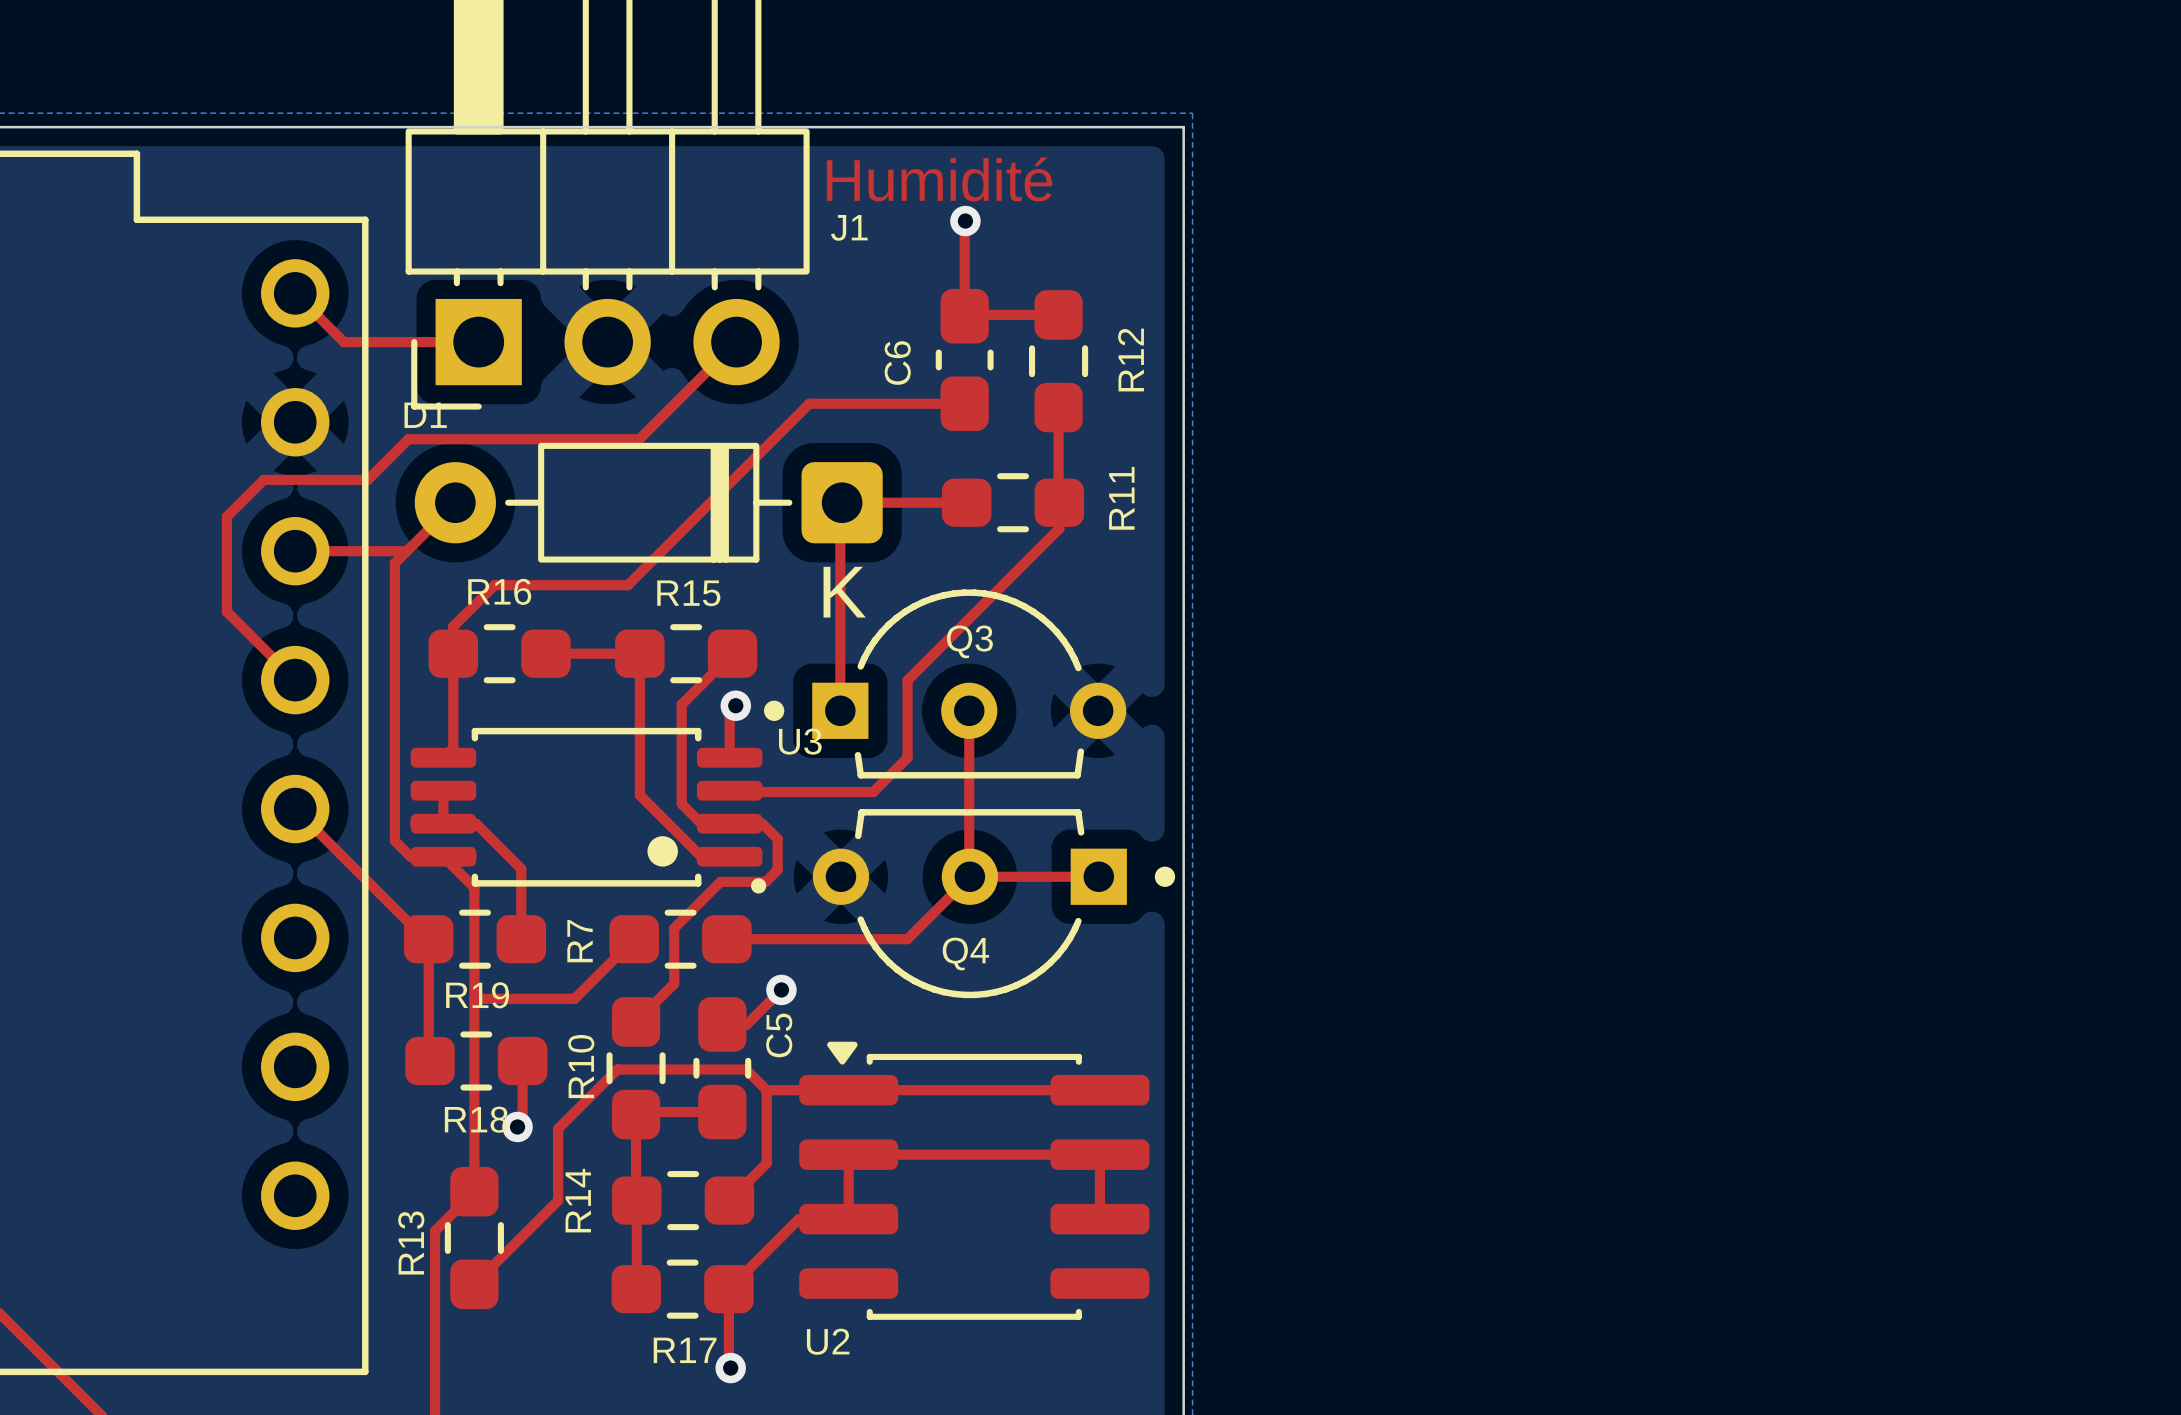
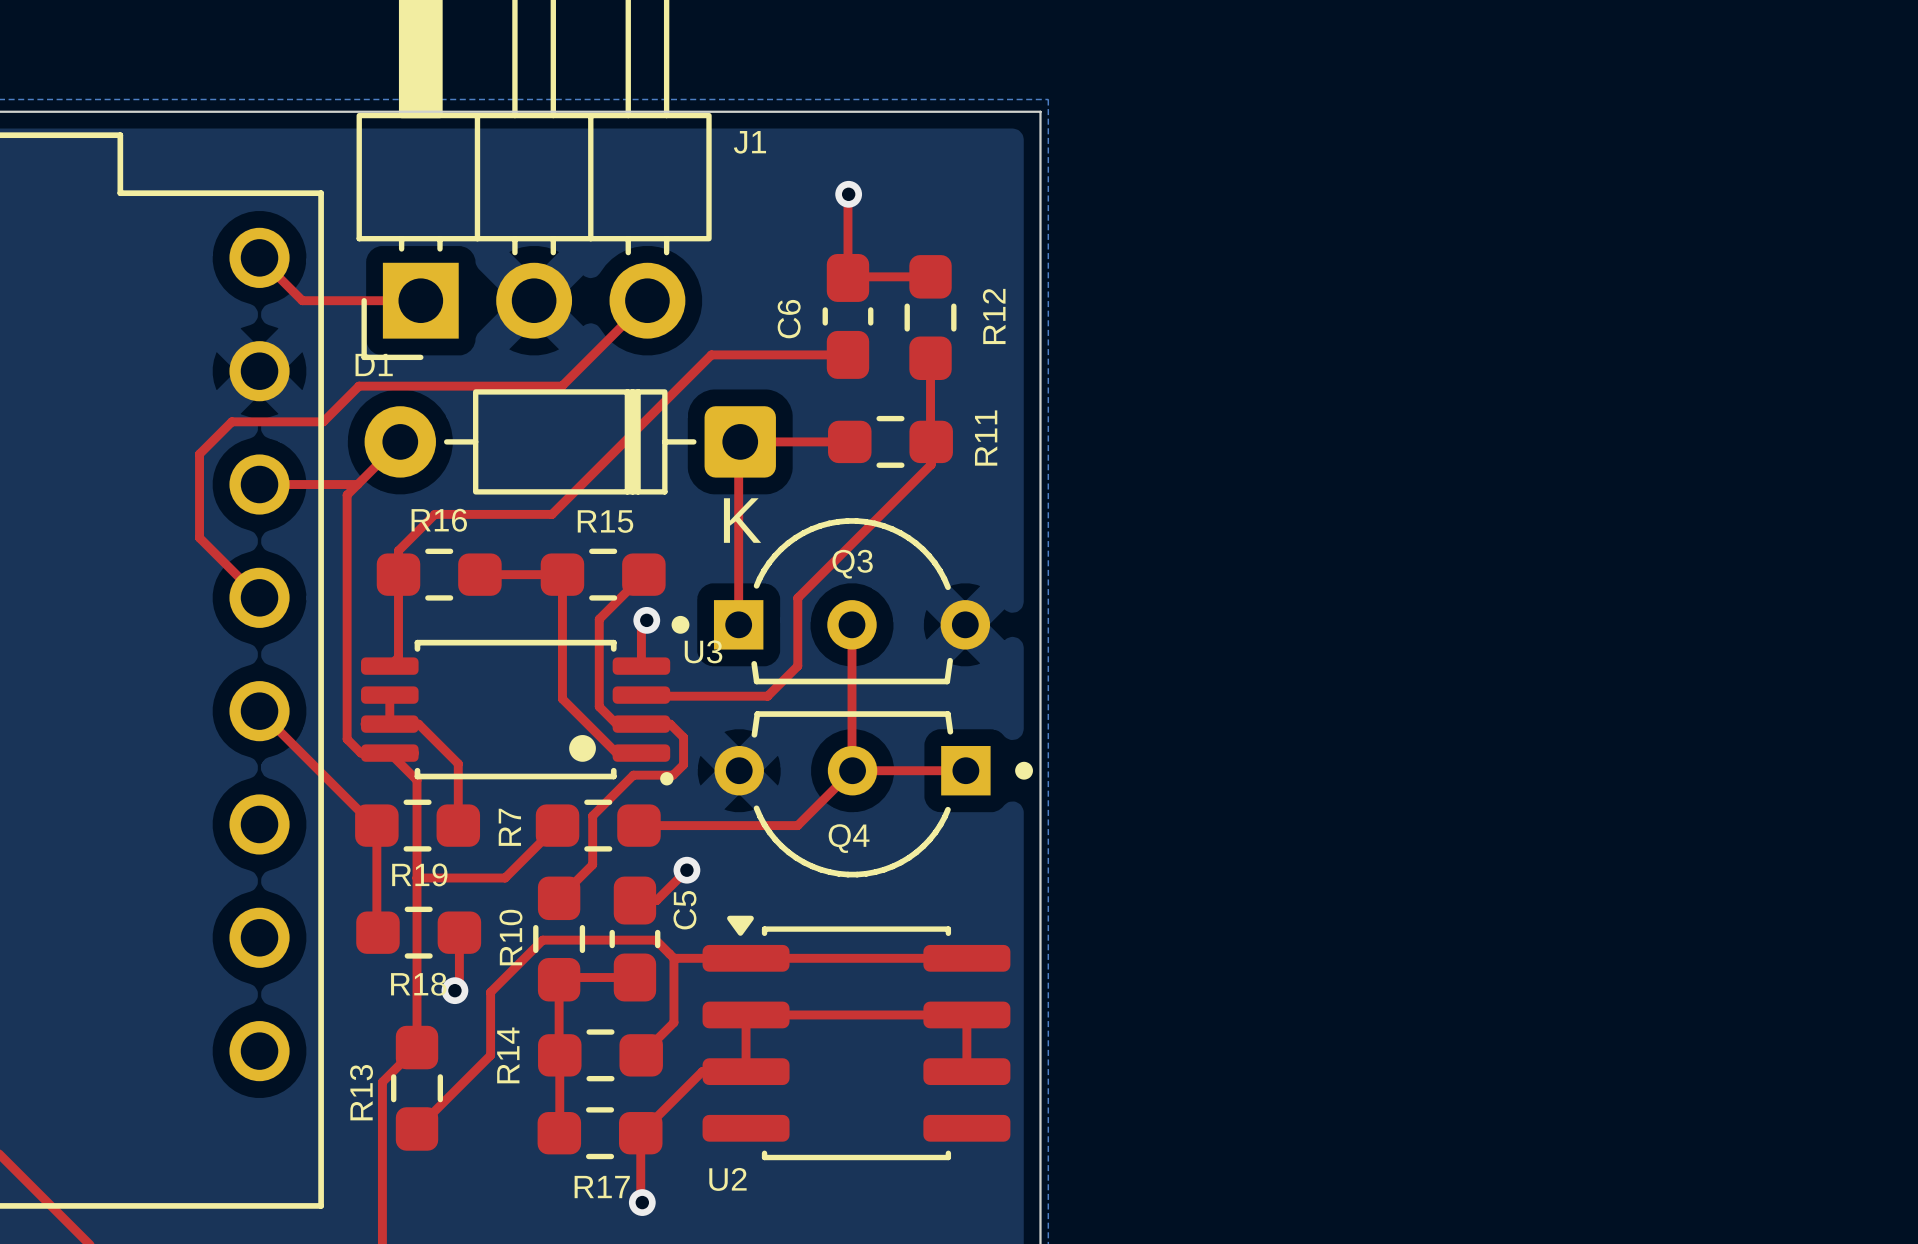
text: Humidité (939, 179) -> none
J1 name position: J1 (849, 227) -> J1 (749, 142)

